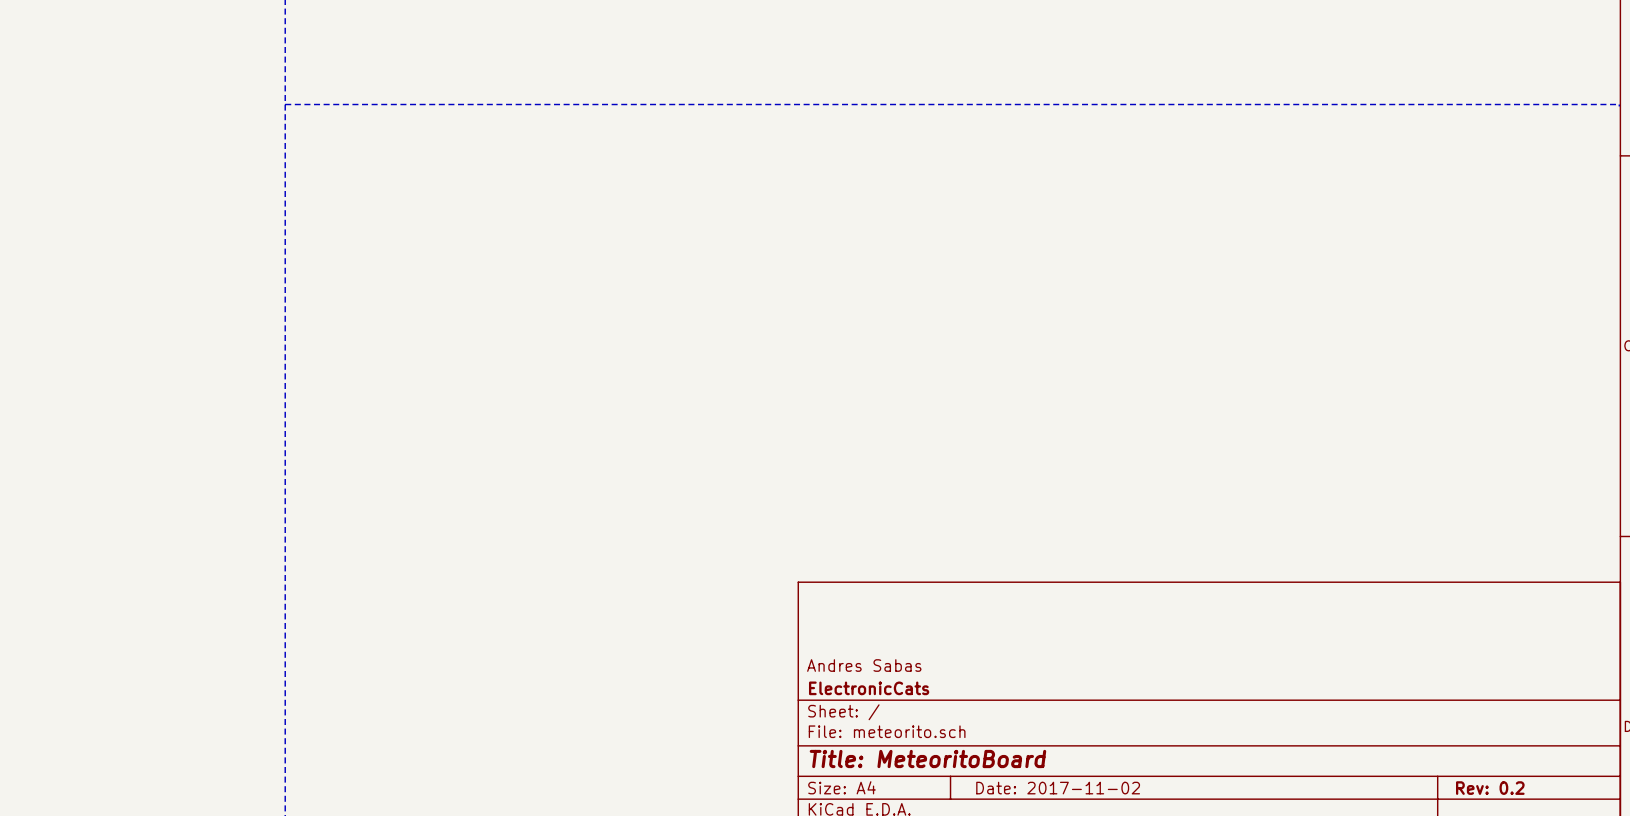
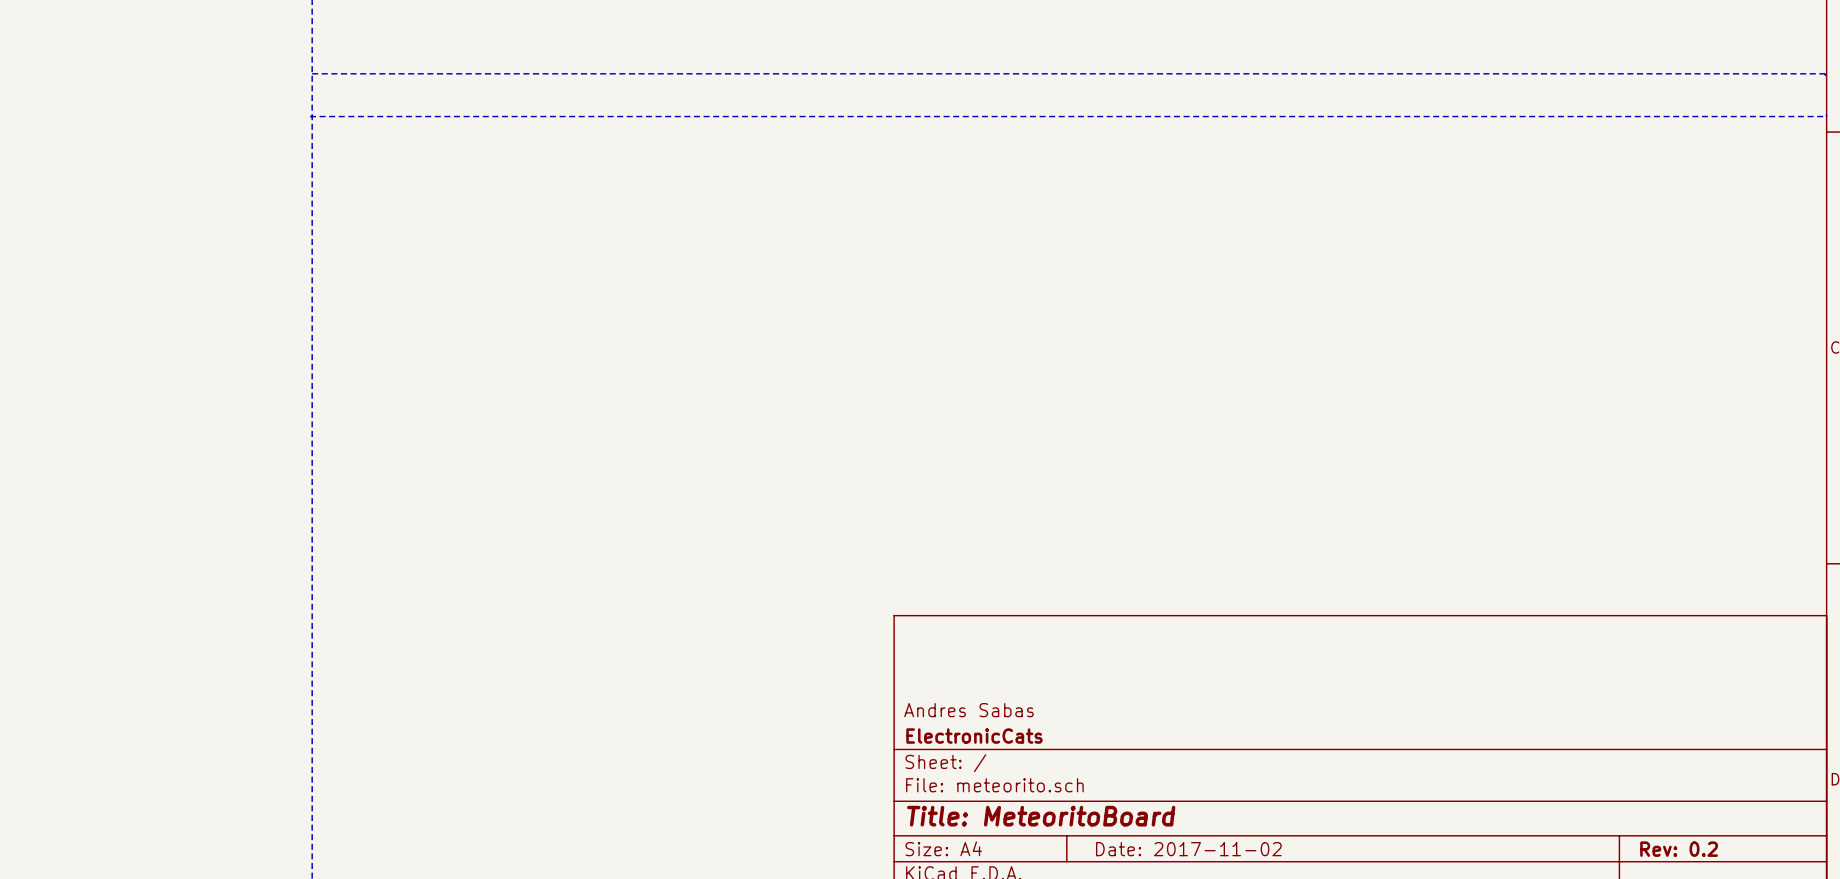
line: none -> (1826, 114) (1826, 116) (309, 116)

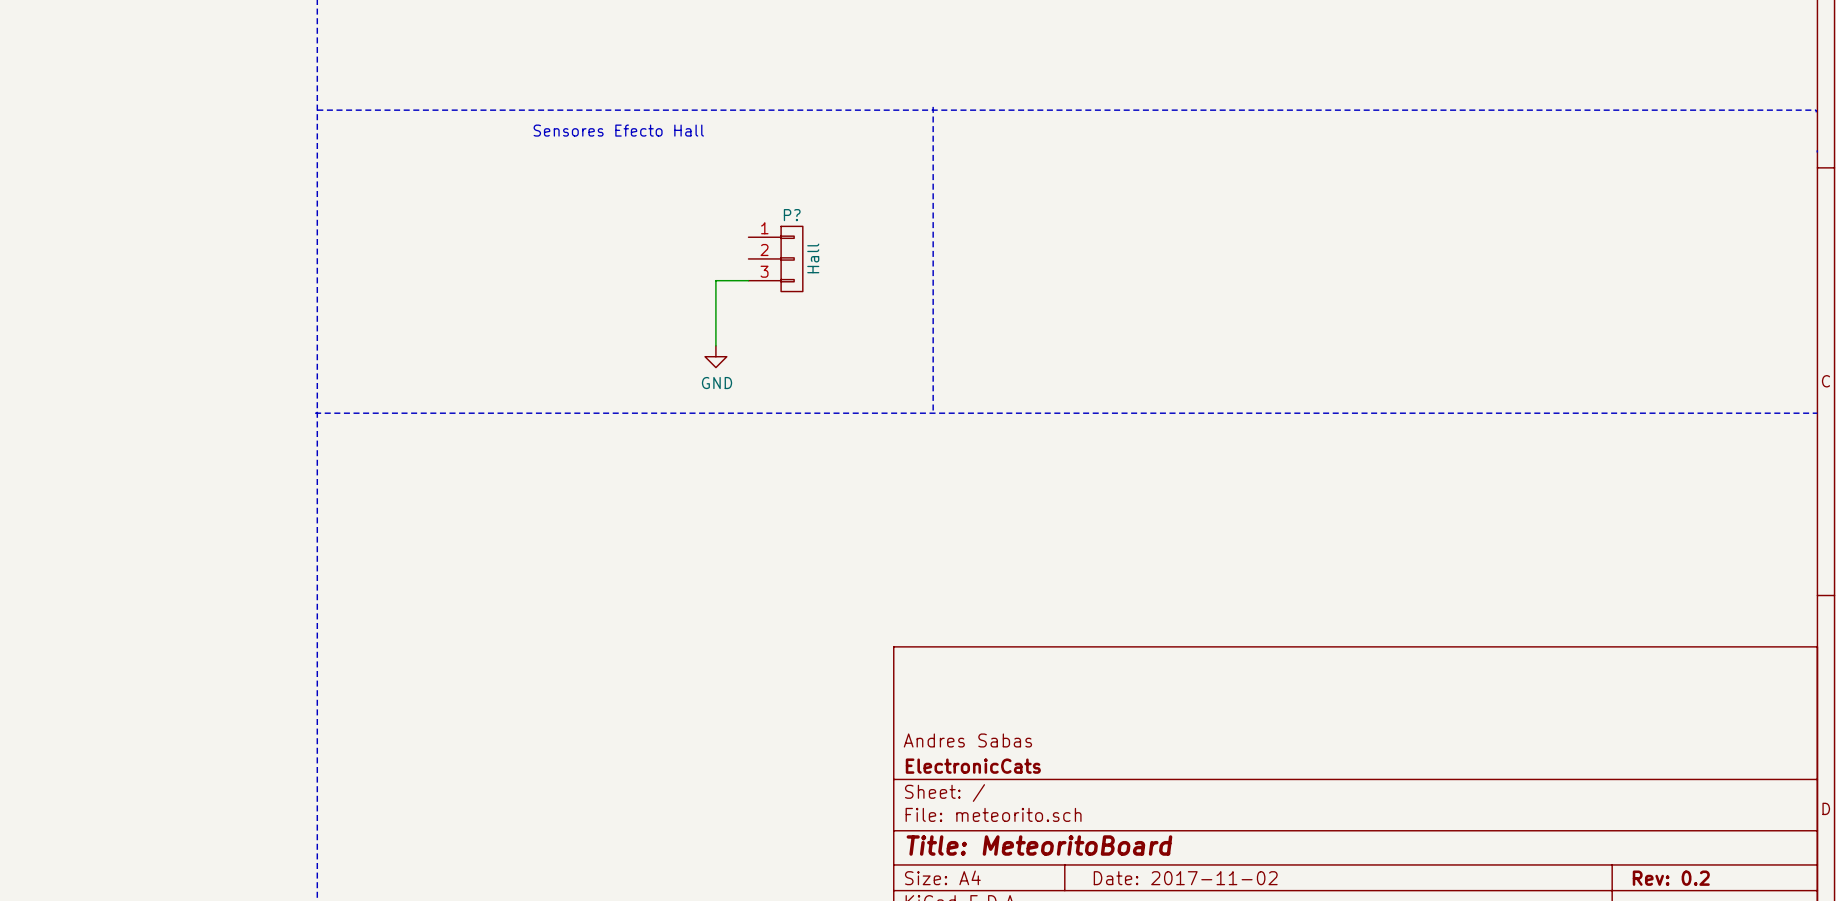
line: none -> (933, 106) (933, 411)
text: none -> Sensores Efecto Hall (618, 130)
line: (309, 116) (1826, 116) -> none
P?: none -> Hall (775, 258)
wire: none -> (748, 280) (715, 280) (715, 345)
power symbol: none -> GND (715, 356)
line: none -> (315, 413) (1817, 413)

